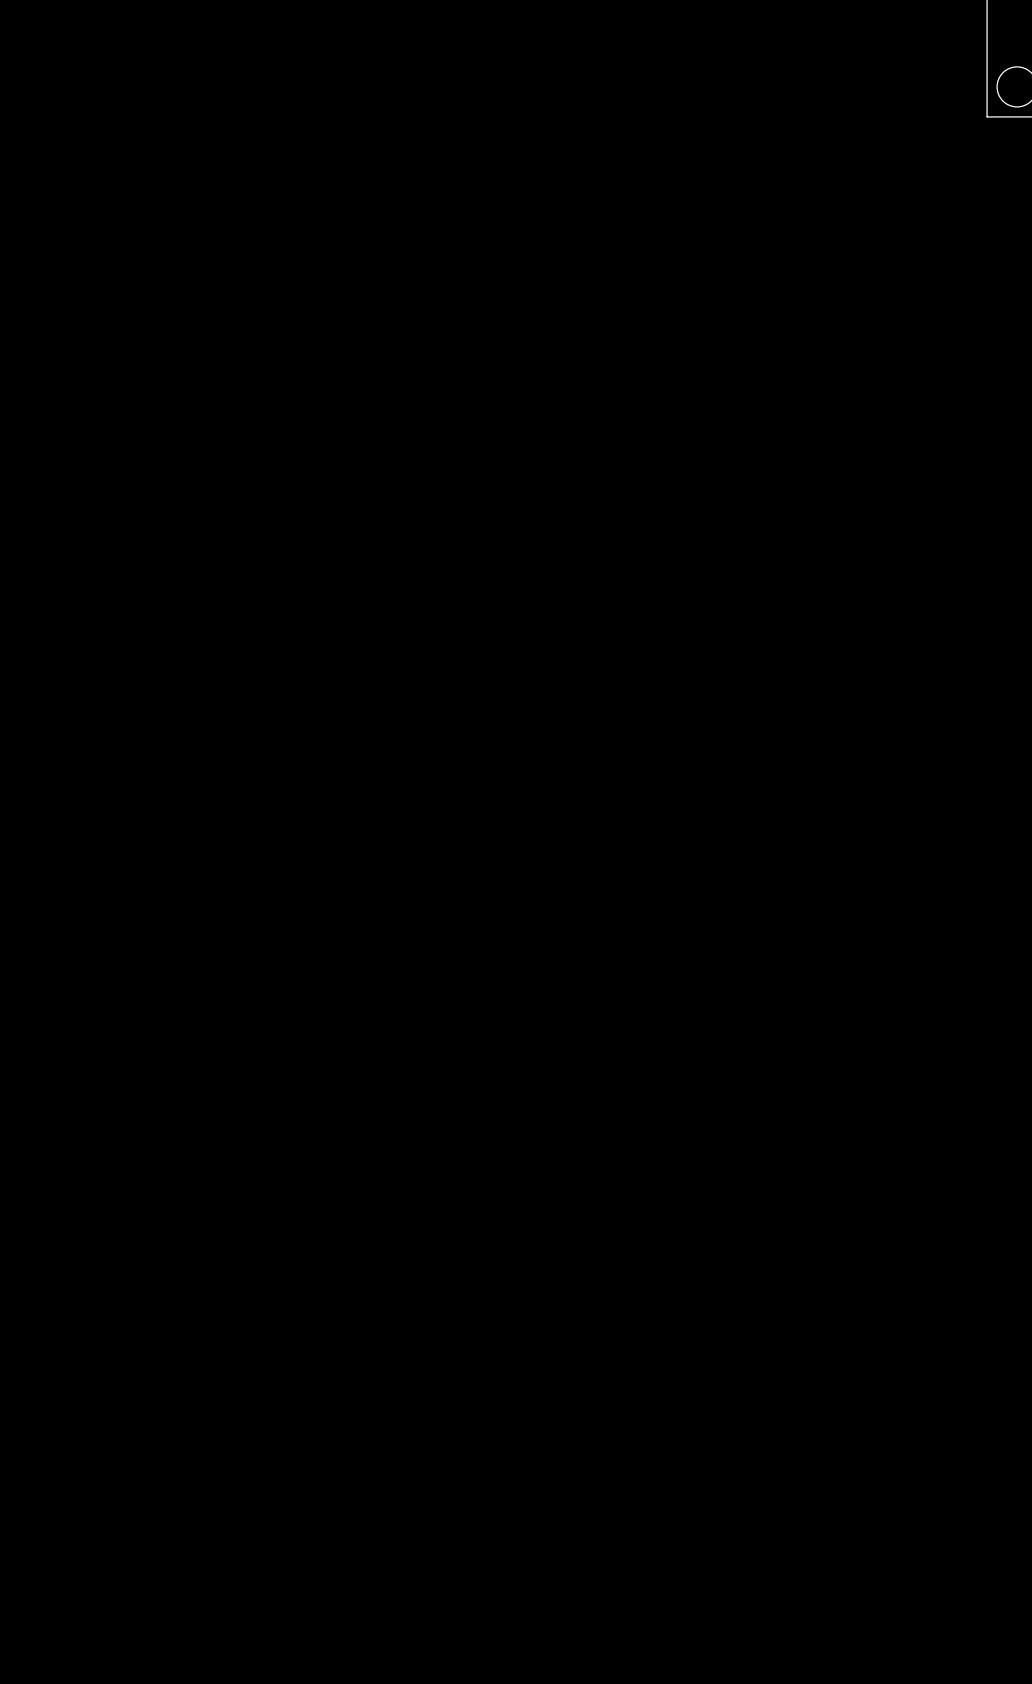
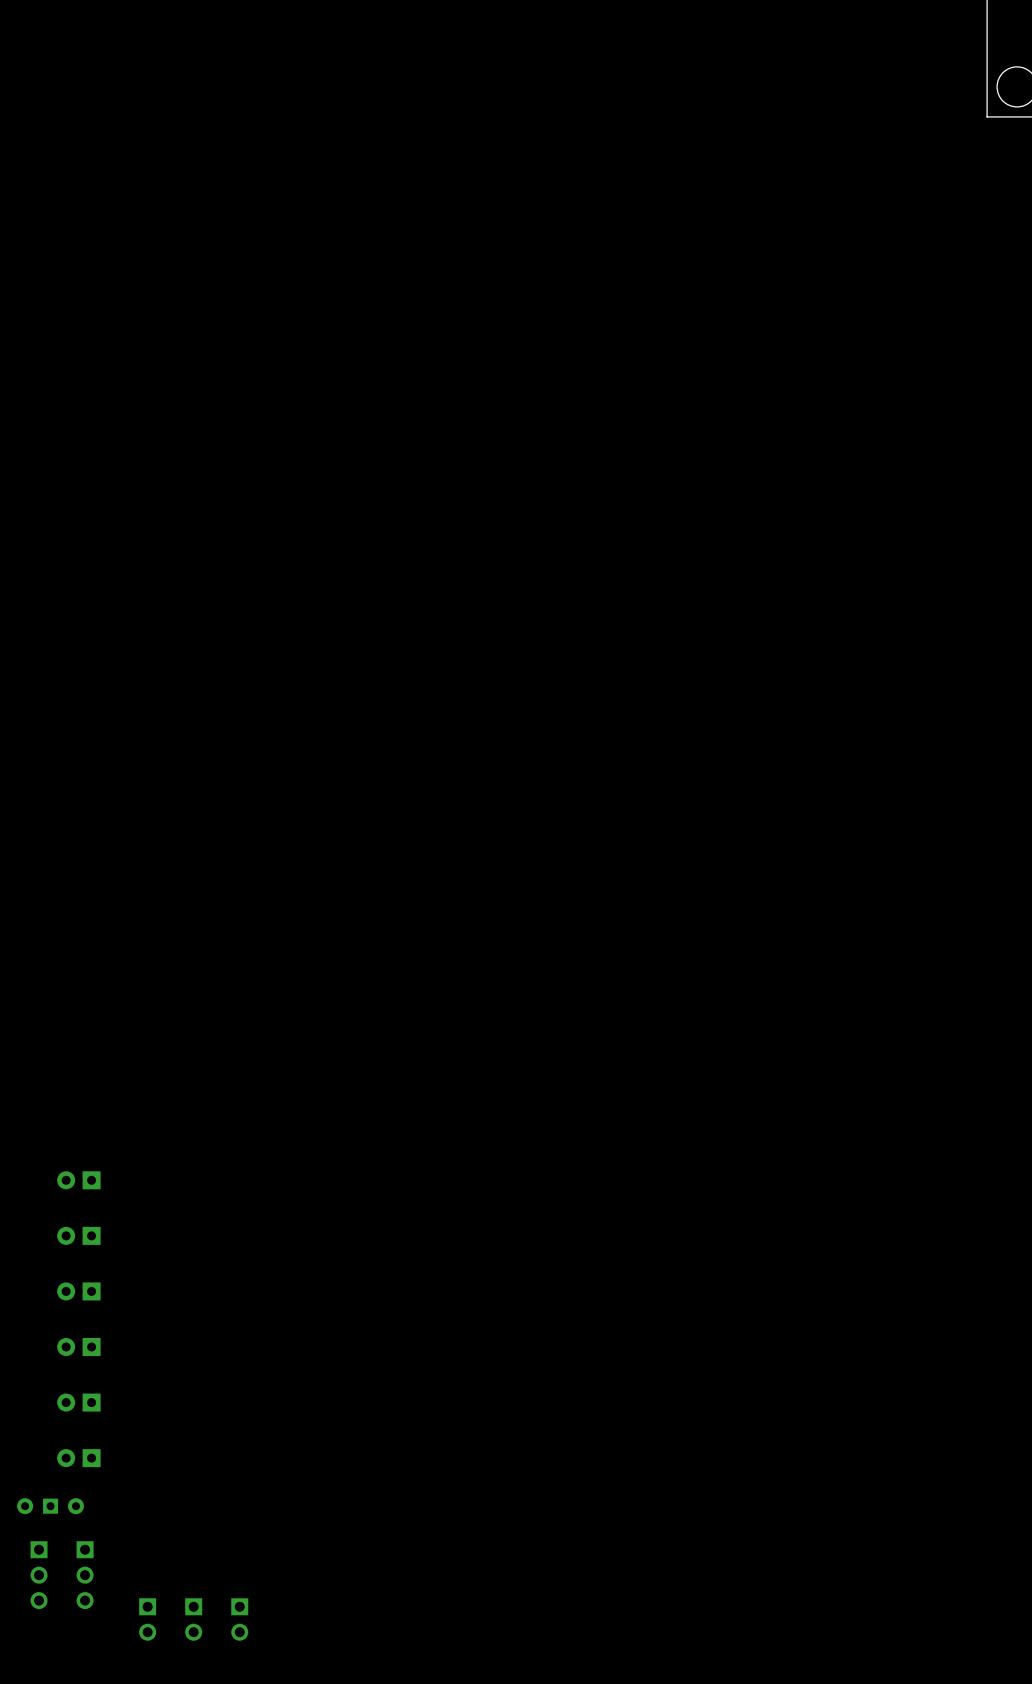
part: none -> (78, 1180)
part: none -> (78, 1235)
part: none -> (78, 1291)
part: none -> (78, 1347)
part: none -> (78, 1402)
part: none -> (78, 1458)
part: none -> (50, 1506)
part: none -> (39, 1575)
part: none -> (85, 1575)
part: none -> (147, 1619)
part: none -> (193, 1619)
part: none -> (239, 1619)

